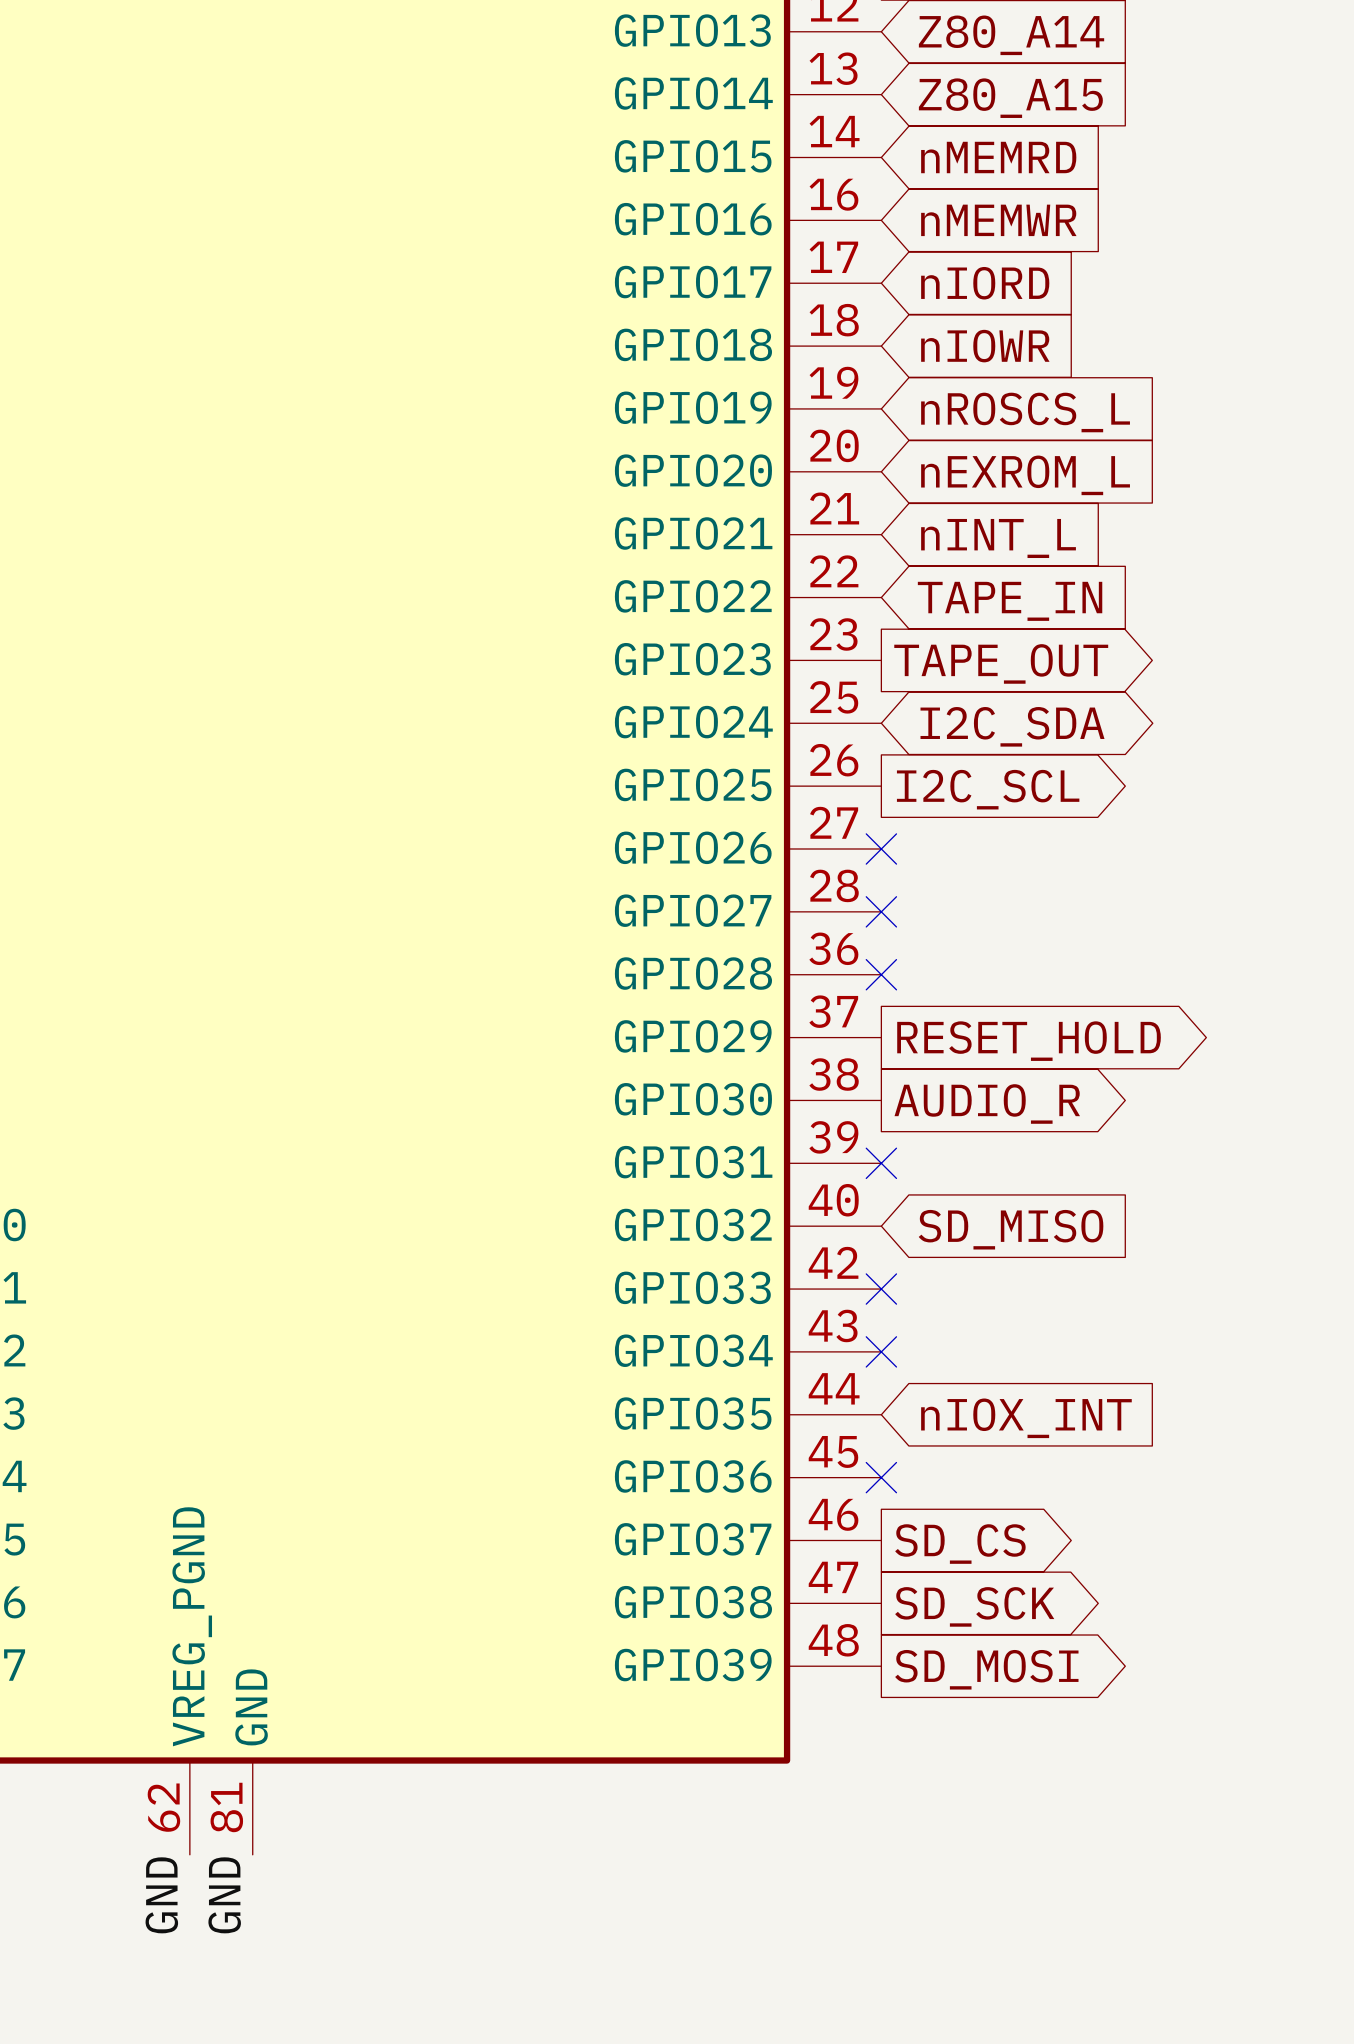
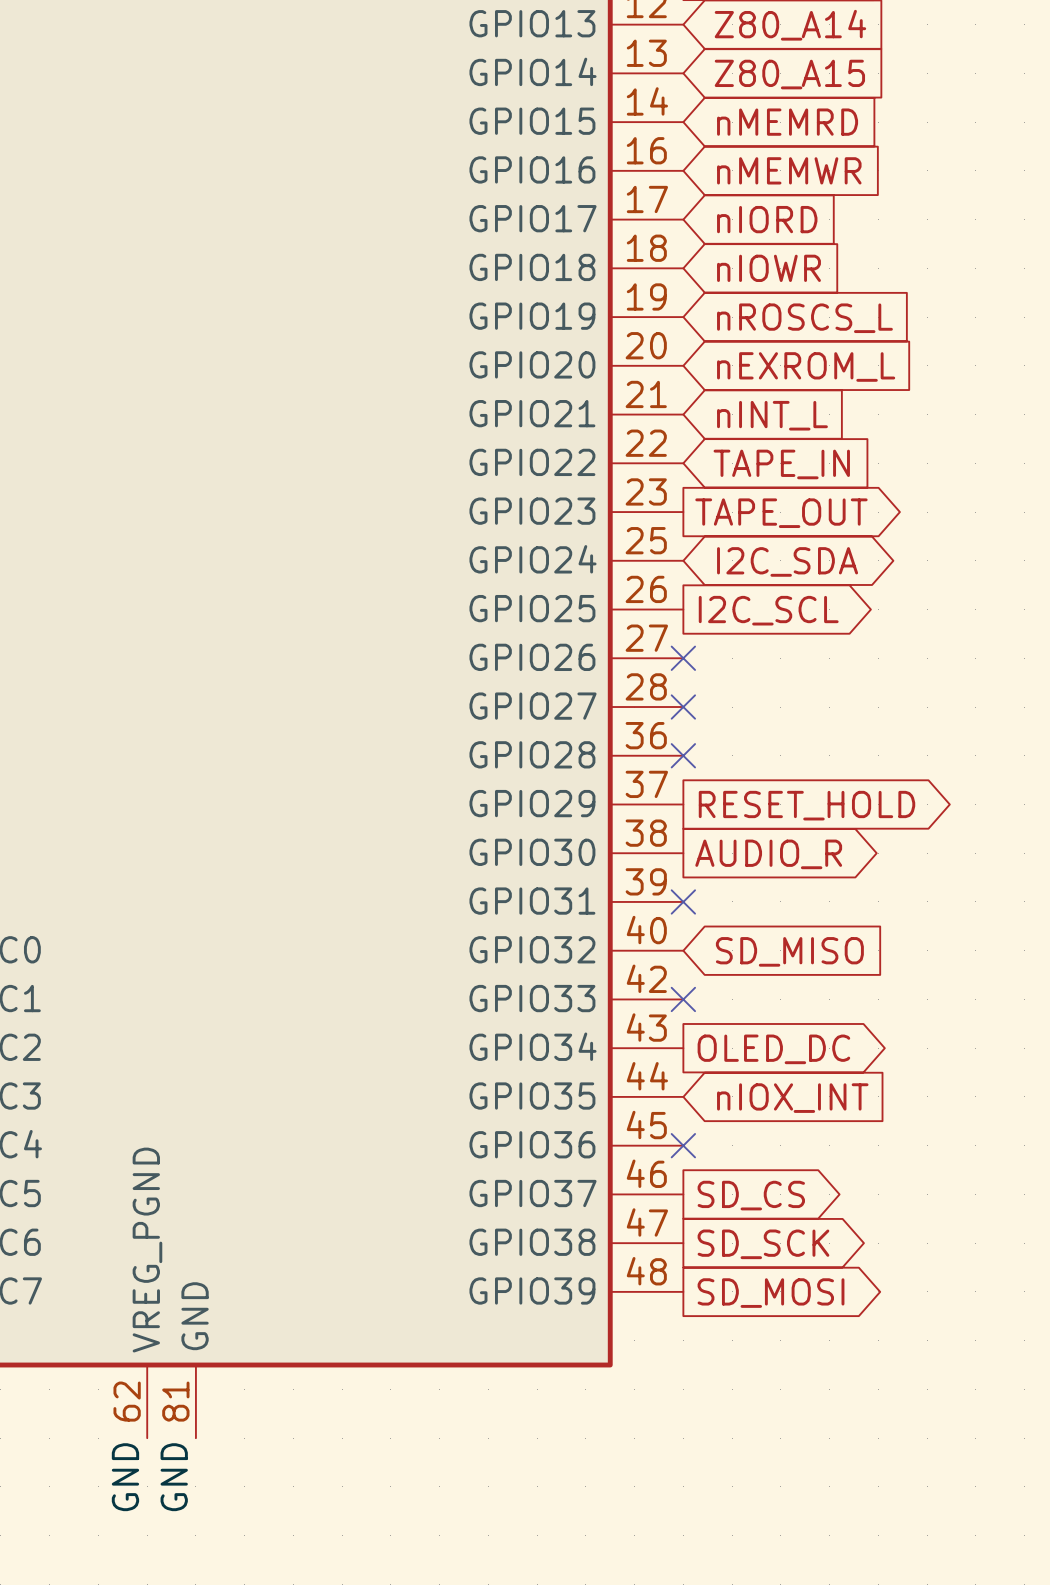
no-connect mark: (881, 1351) -> none
global label: none -> OLED_DC (773, 1049)

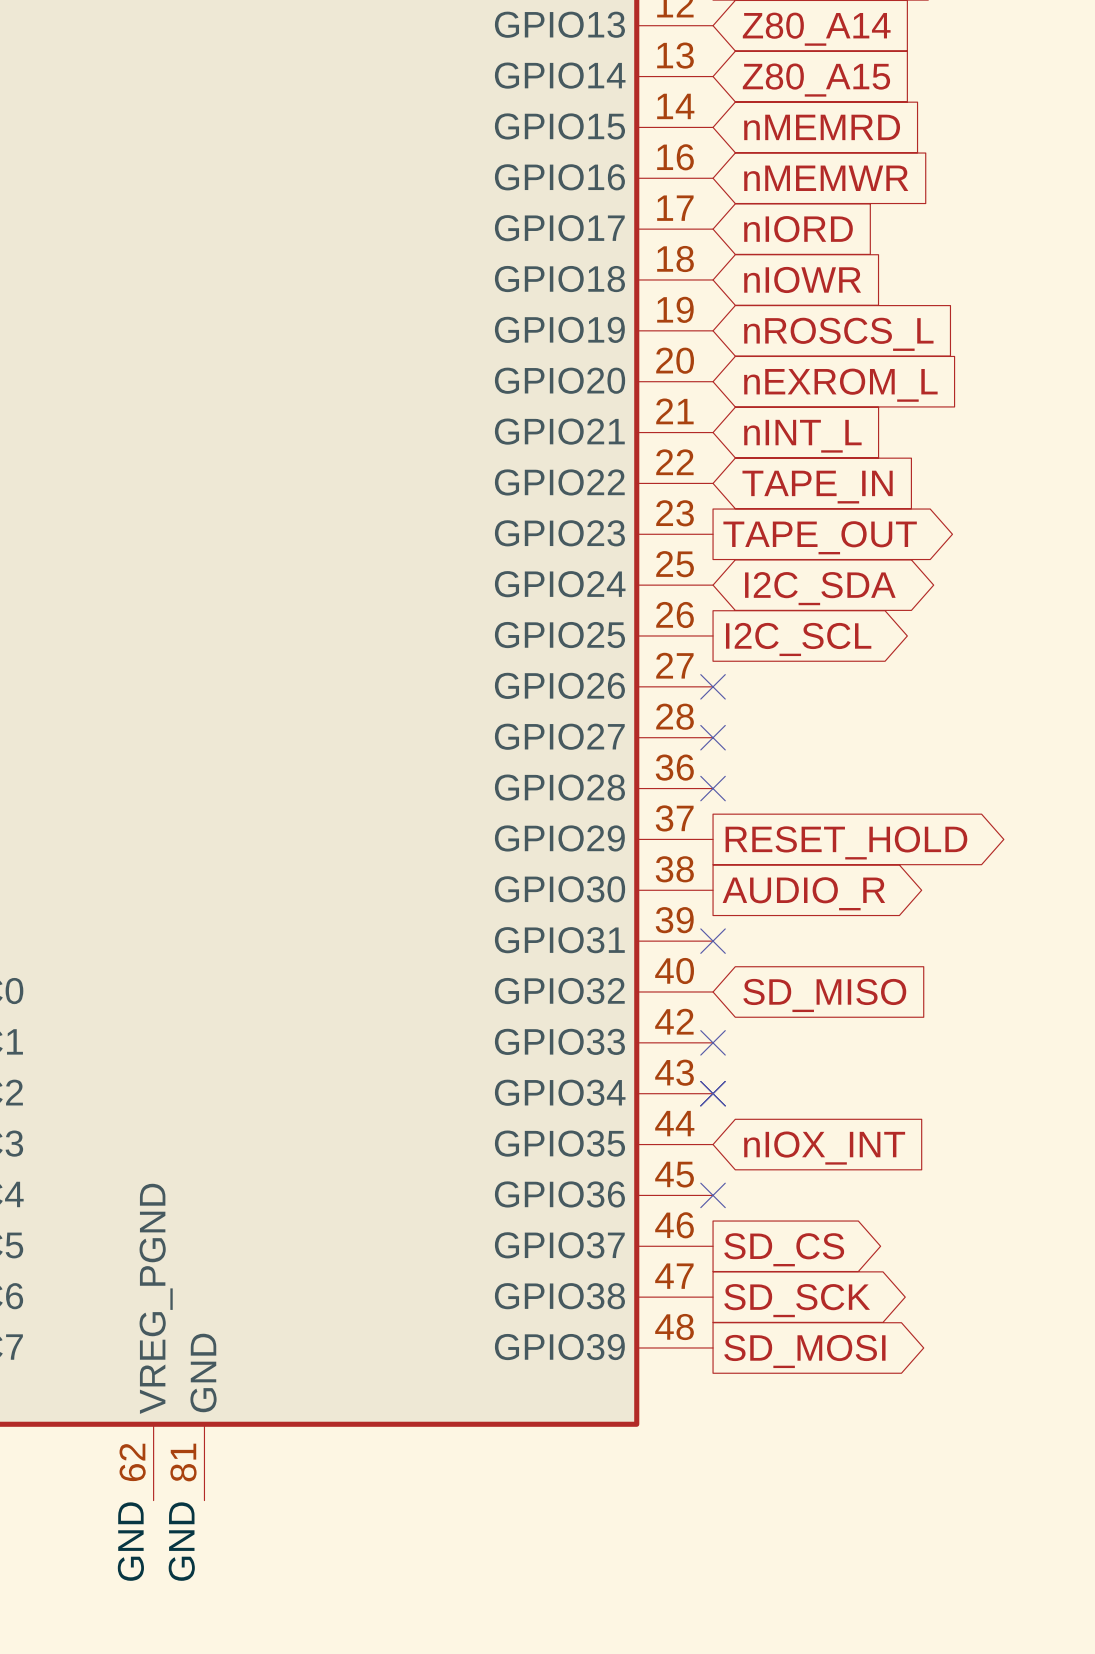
no-connect mark: none -> (713, 1093)
global label: OLED_DC (773, 1049) -> none

